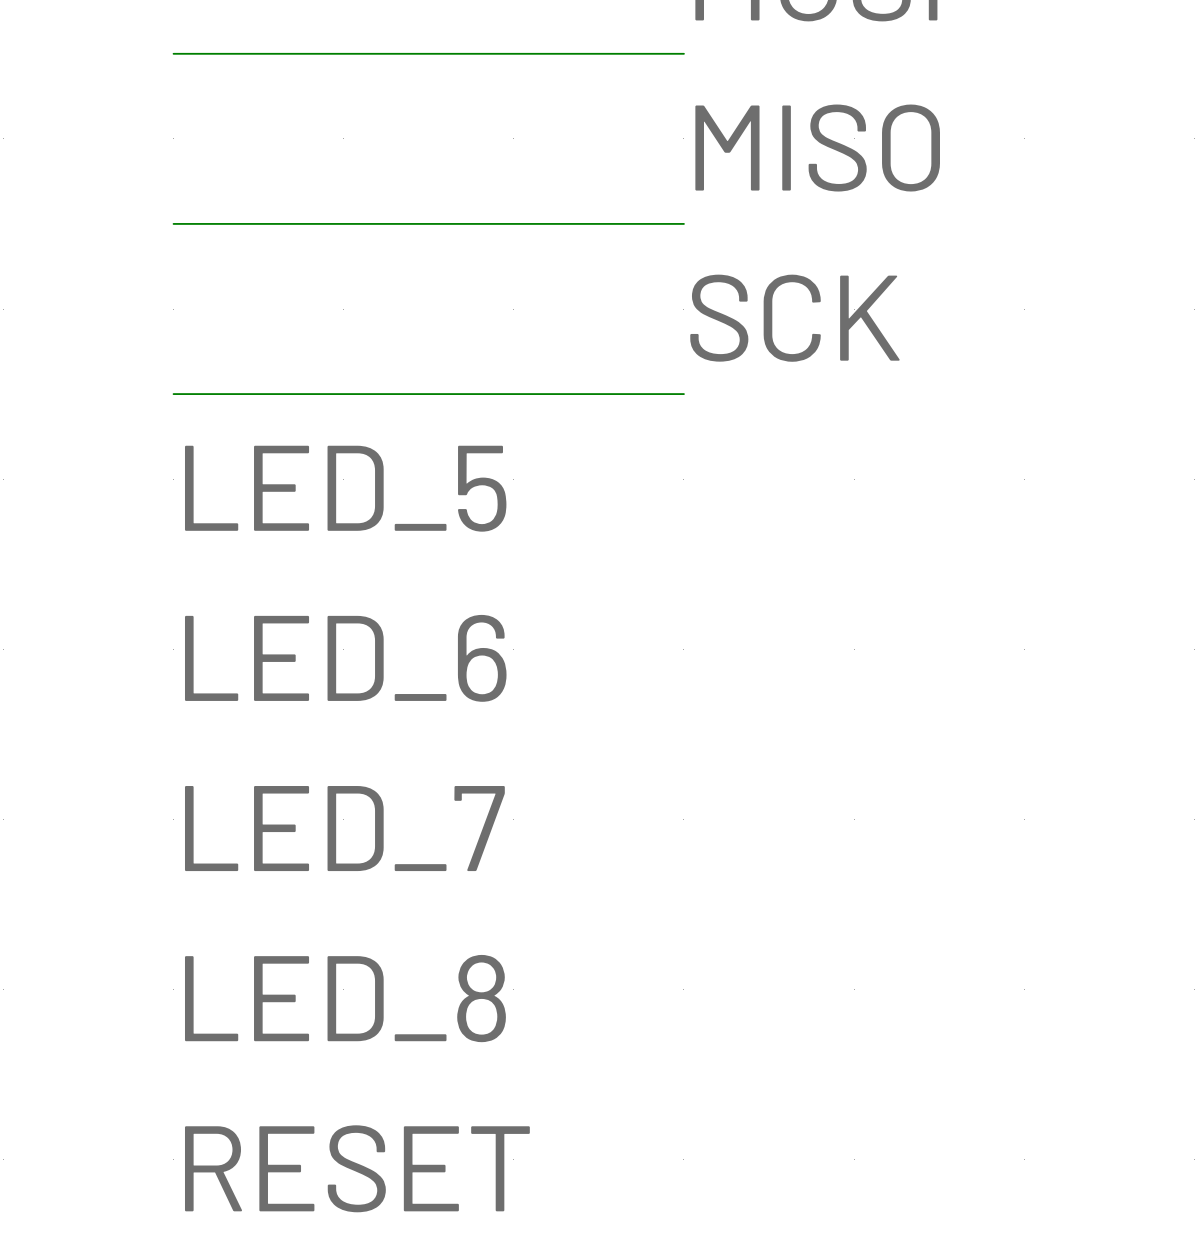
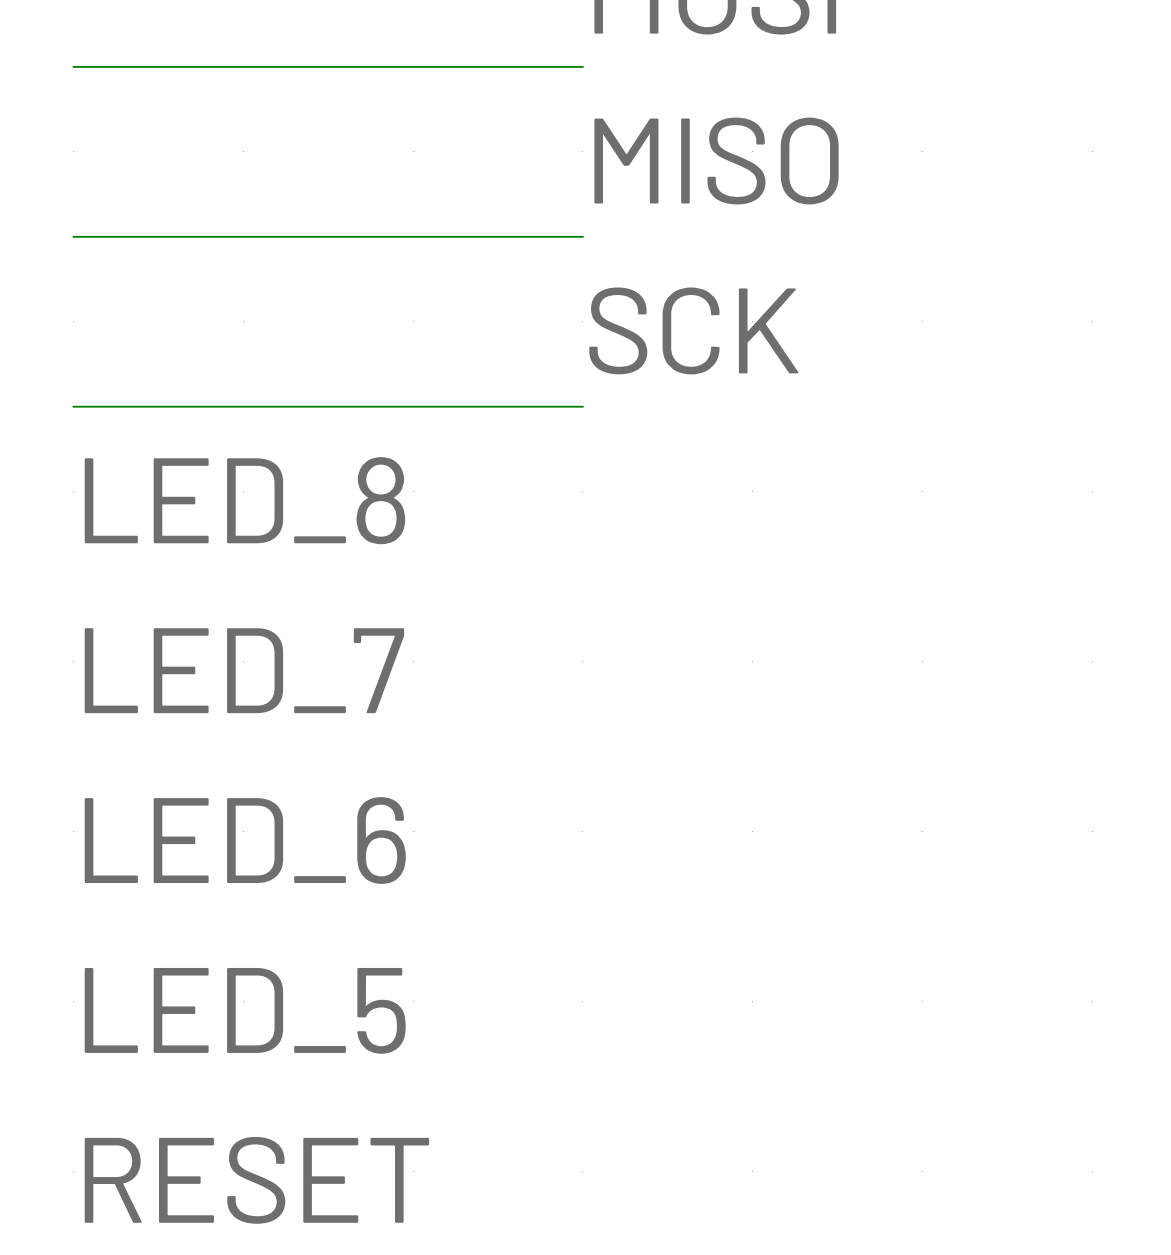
label: LED_5 (345, 488) -> LED_8 (244, 500)
label: LED_6 (345, 658) -> LED_7 (244, 670)
label: LED_7 (344, 828) -> LED_6 (245, 840)
label: LED_8 (345, 998) -> LED_5 (245, 1010)

